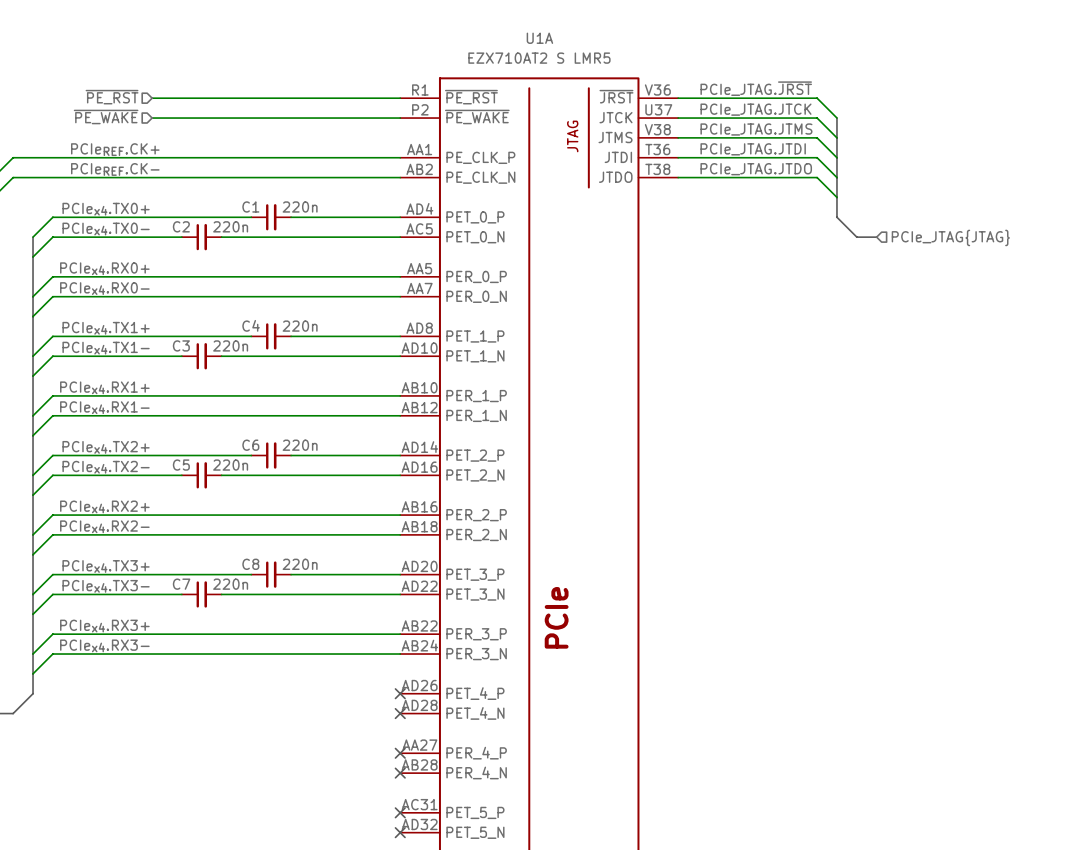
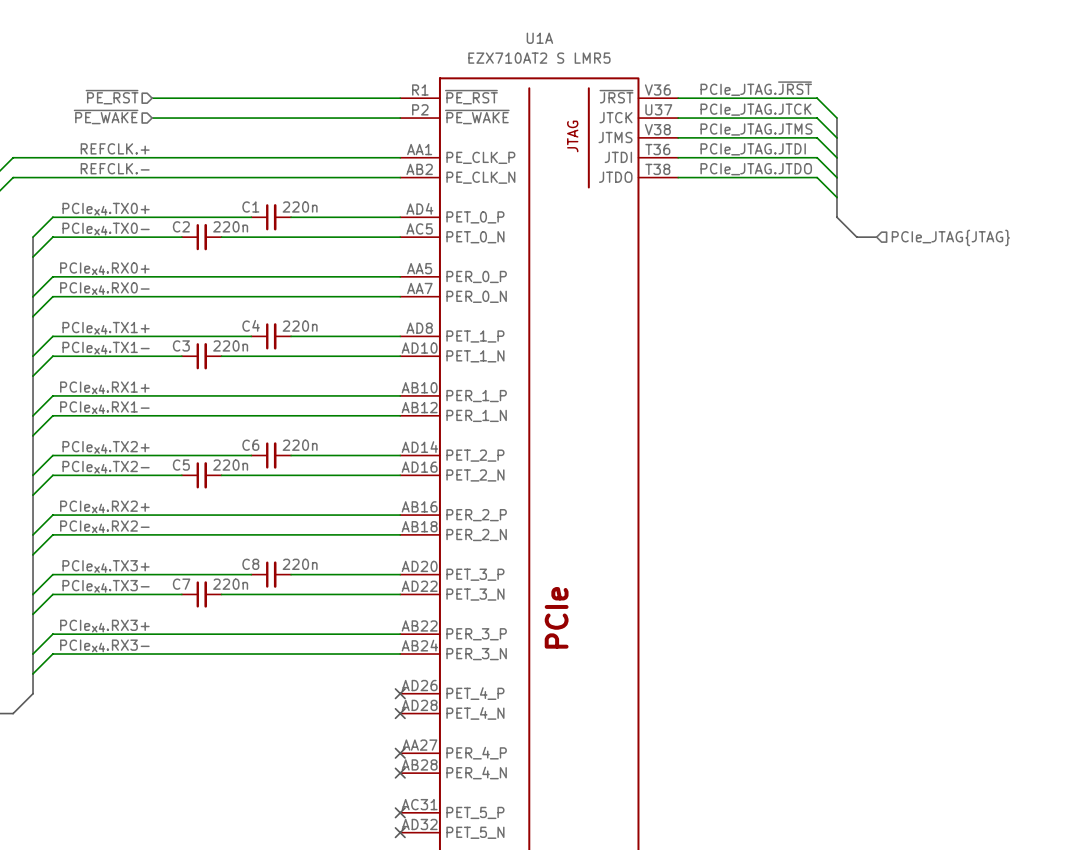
label: none -> REFCLK.+ (115, 148)
label: PCIeREF.CK+ (115, 149) -> none
label: none -> REFCLK.- (115, 168)
label: PCIeREF.CK- (115, 169) -> none

